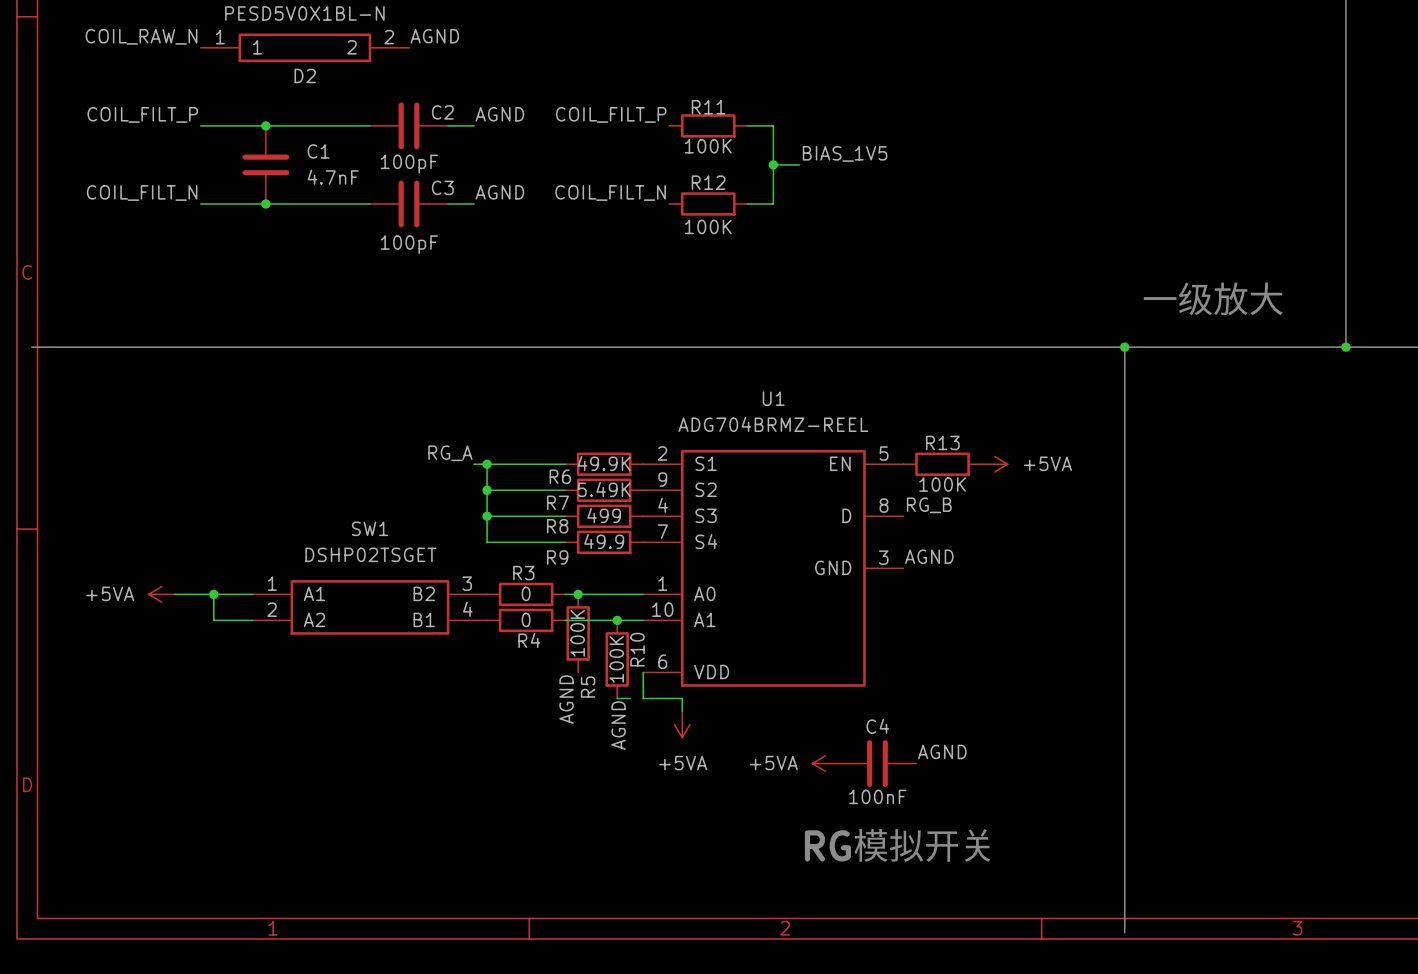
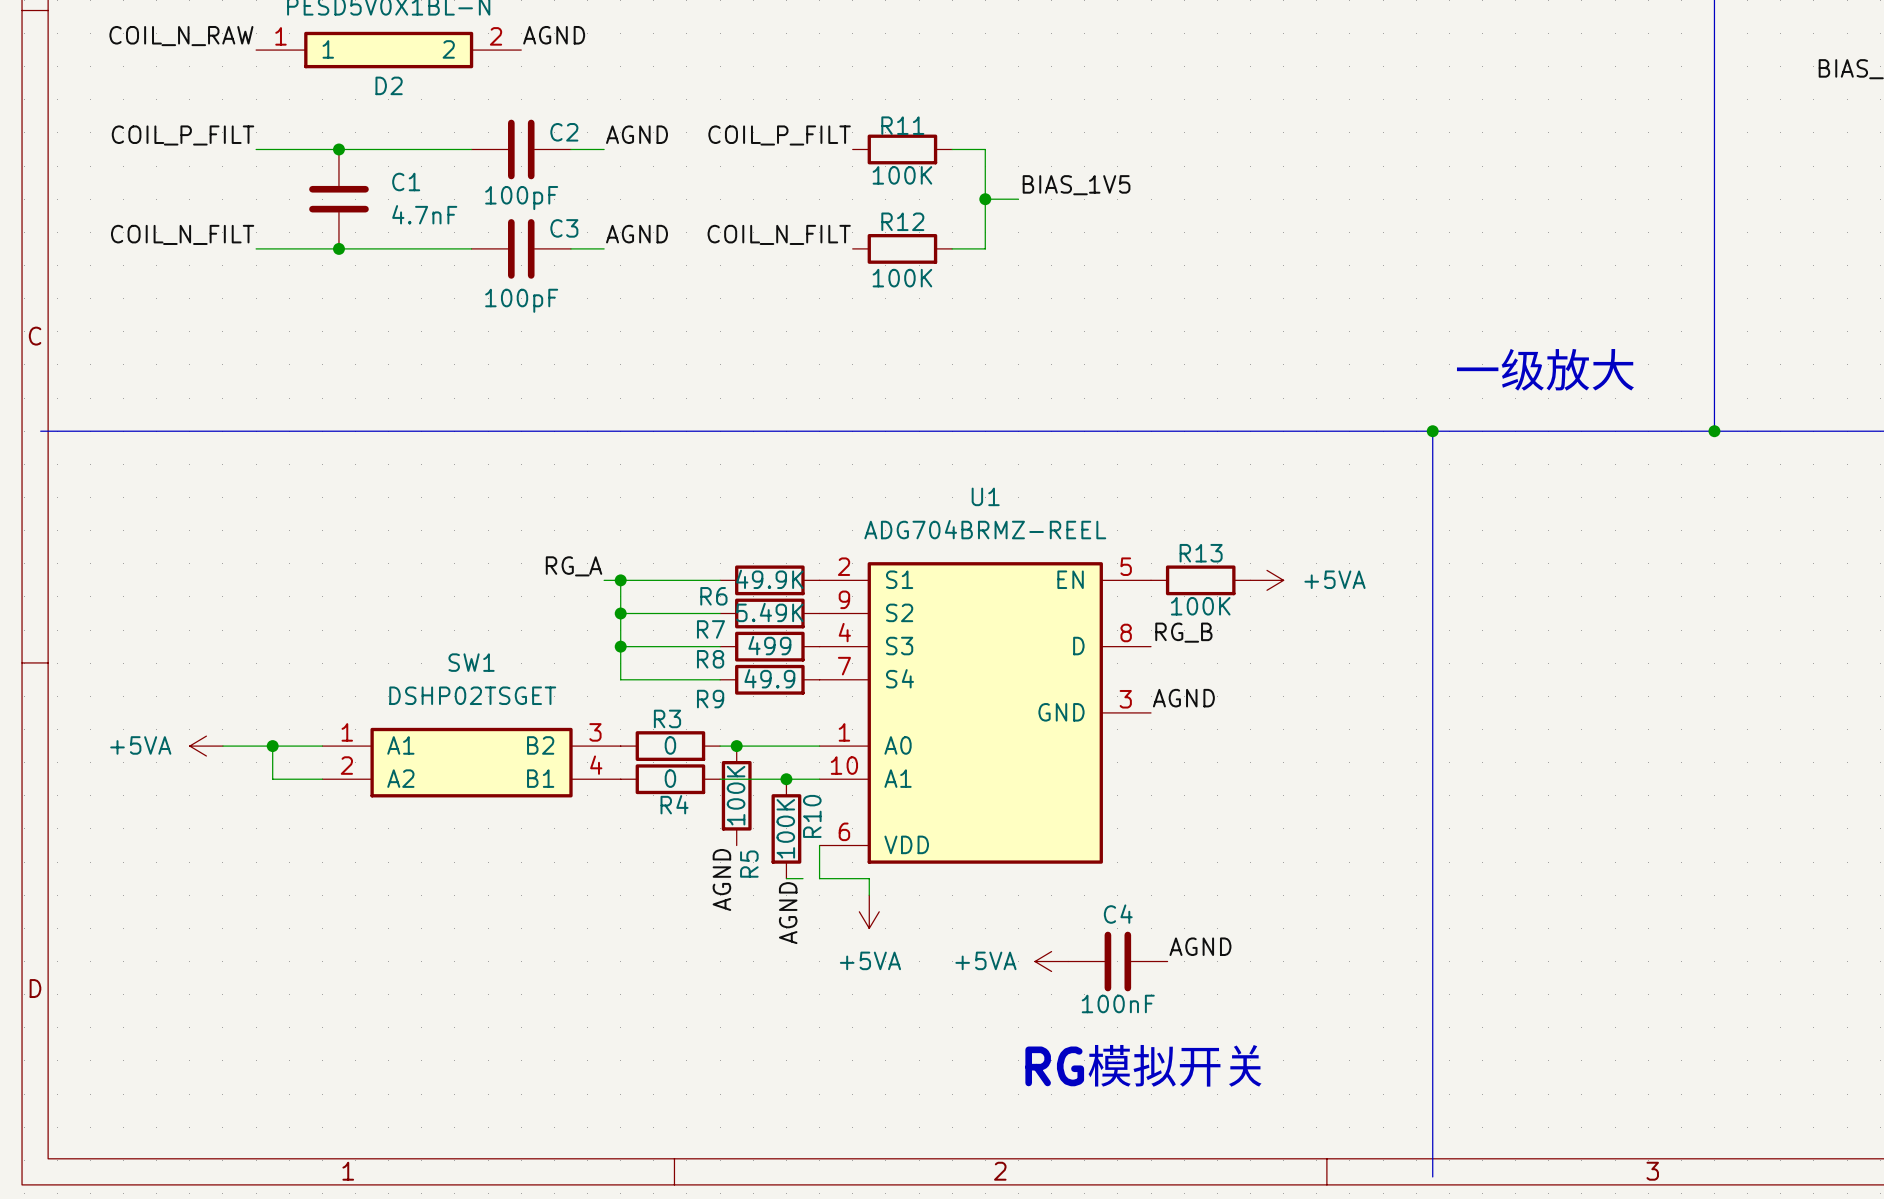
label: COIL_RAW_N (141, 36) -> COIL_N_RAW (181, 36)
label: COIL_FILT_P (142, 114) -> COIL_P_FILT (183, 135)
label: COIL_FILT_P (611, 114) -> COIL_P_FILT (779, 135)
label: COIL_FILT_N (142, 192) -> COIL_N_FILT (182, 234)
label: COIL_FILT_N (610, 192) -> COIL_N_FILT (779, 234)

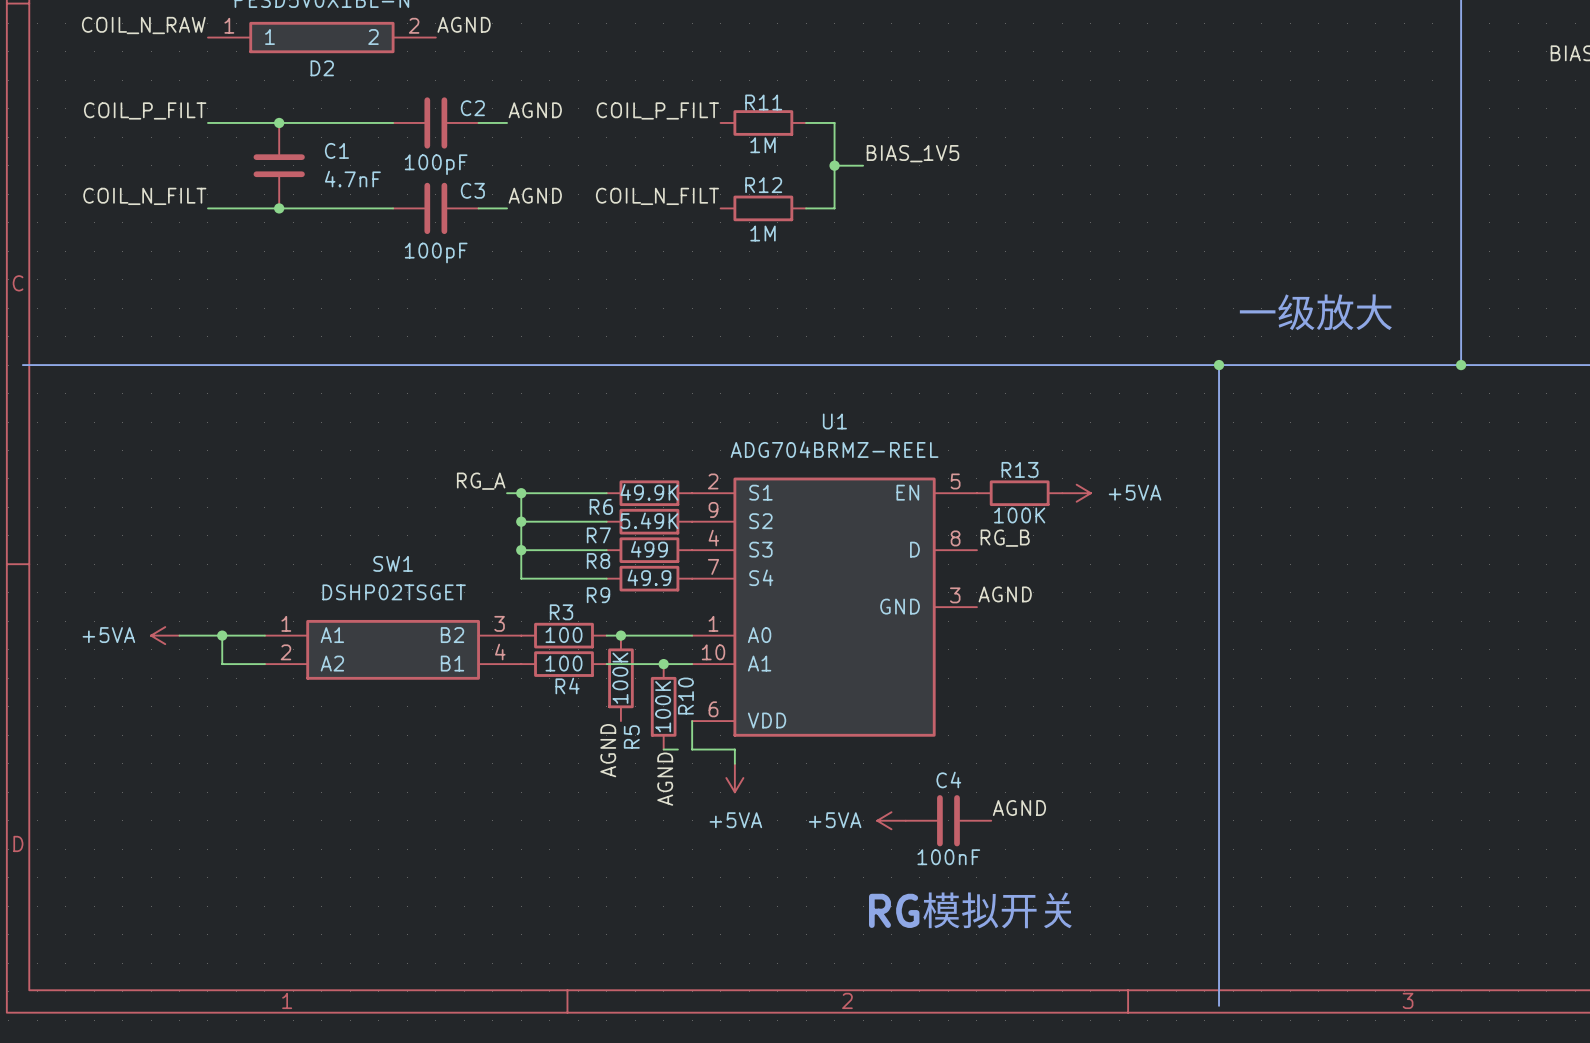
R11 value: 100K (902, 175) -> 1M (763, 145)
R12 value: 100K (902, 278) -> 1M (763, 233)
R3 value: 0 (670, 745) -> 100 (563, 635)
R4 value: 0 (670, 778) -> 100 (563, 663)

